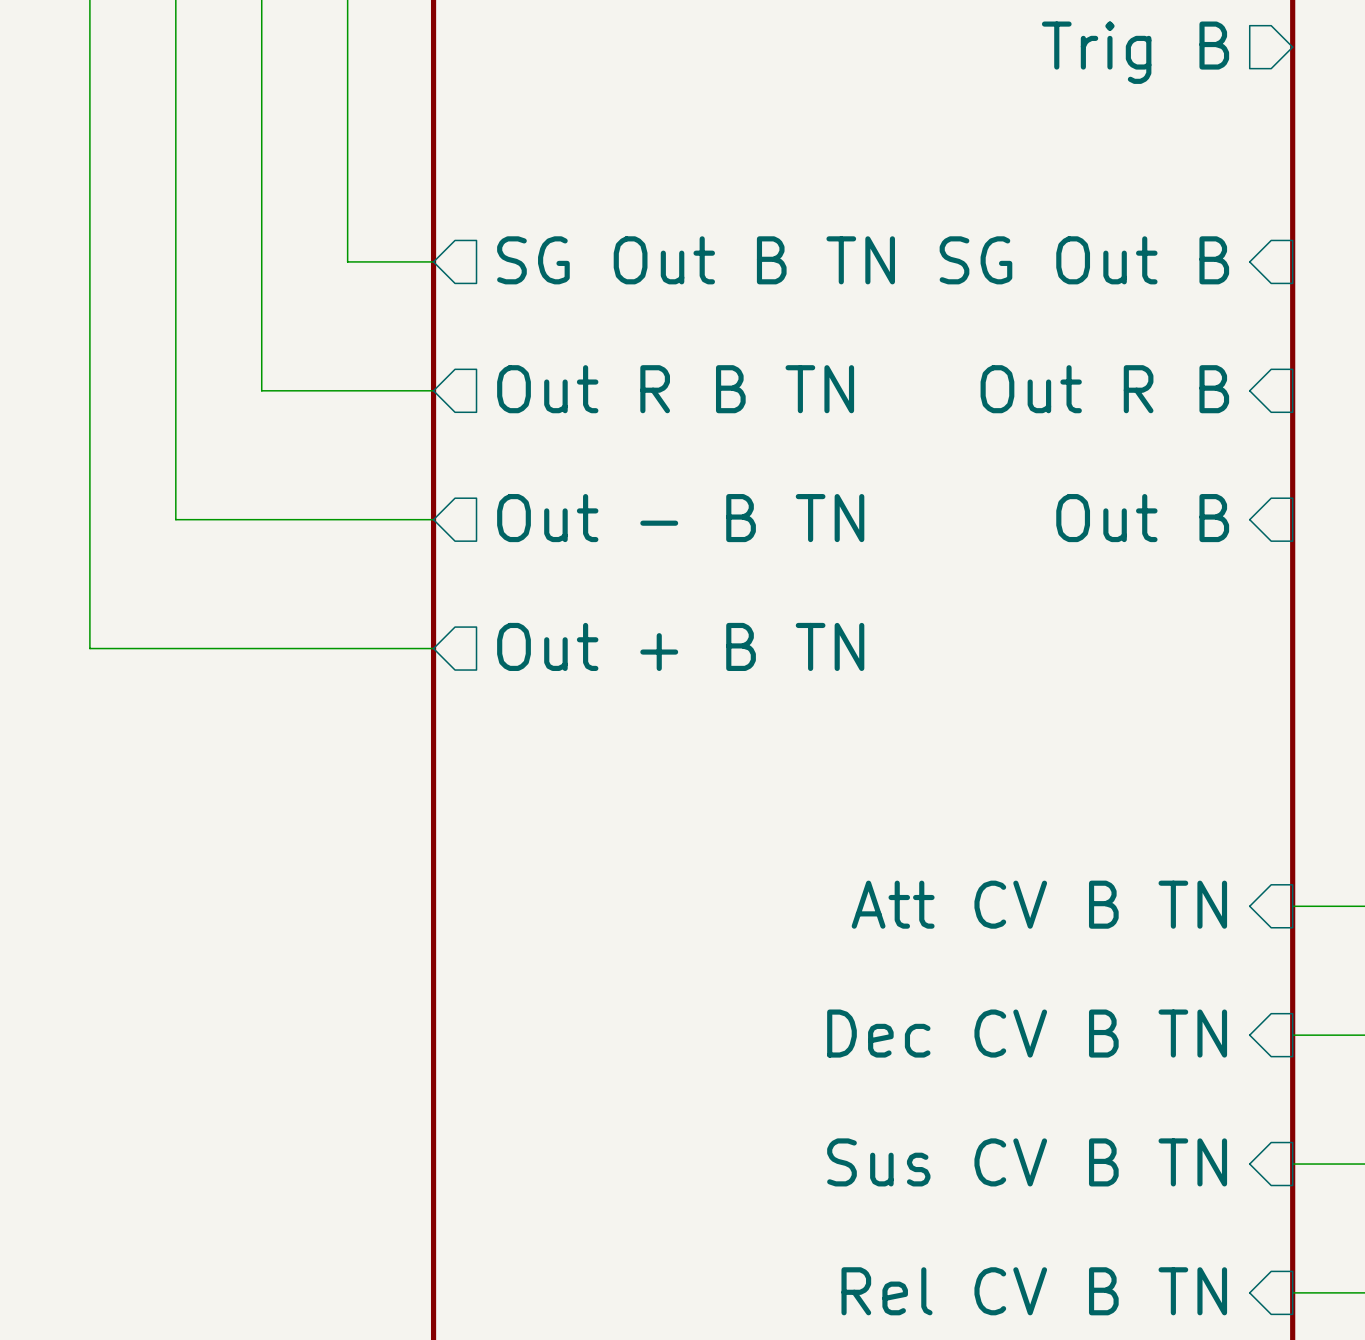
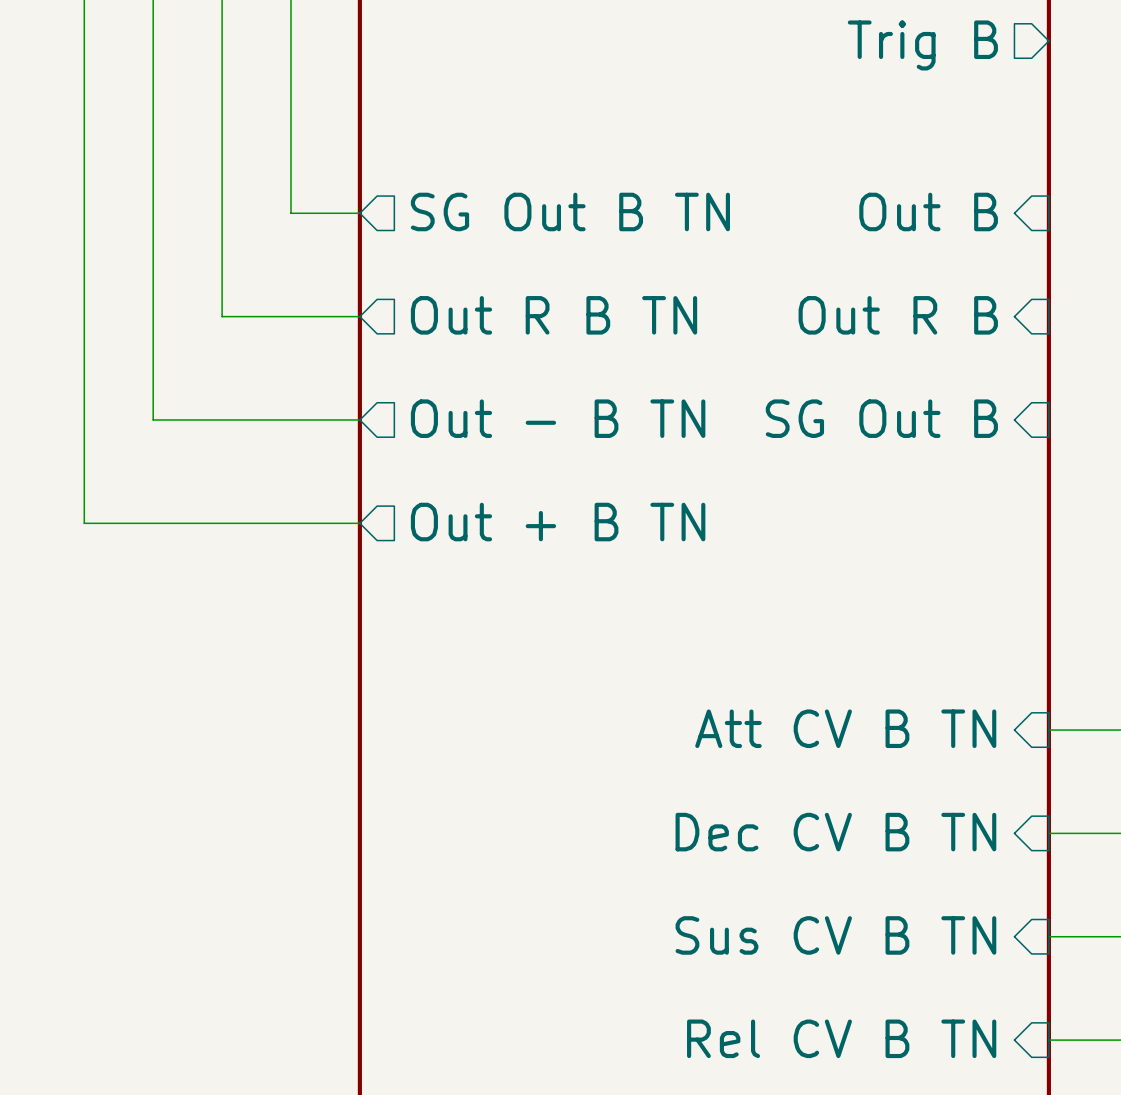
sheet pin: SG Out B (1084, 260) -> Out B (928, 211)
sheet pin: Out B (1142, 518) -> SG Out B (881, 418)

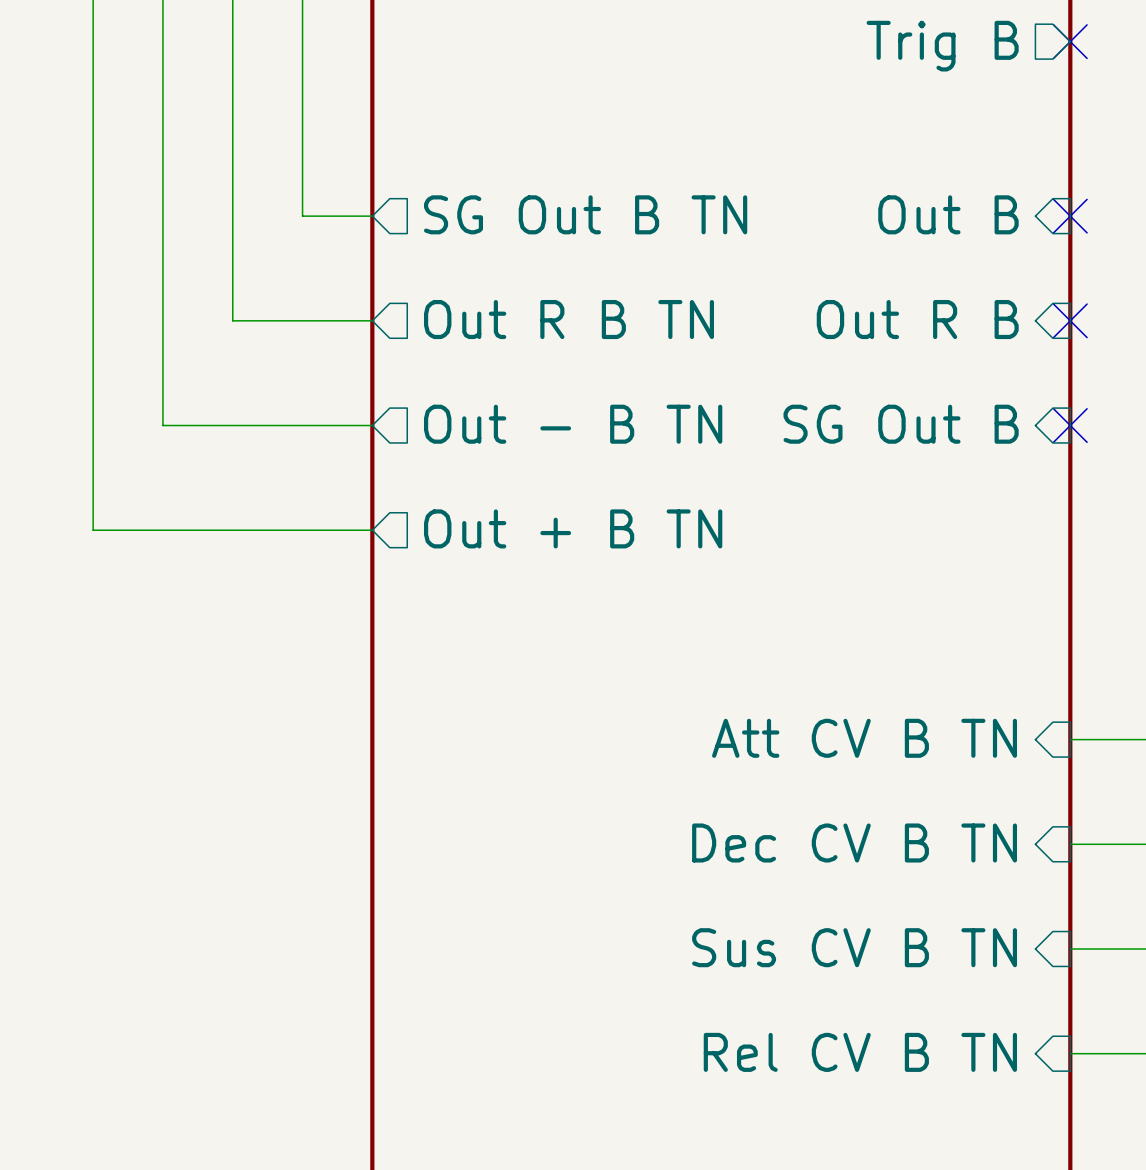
no-connect mark: none -> (1070, 41)
no-connect mark: none -> (1070, 216)
no-connect mark: none -> (1070, 320)
no-connect mark: none -> (1070, 425)

